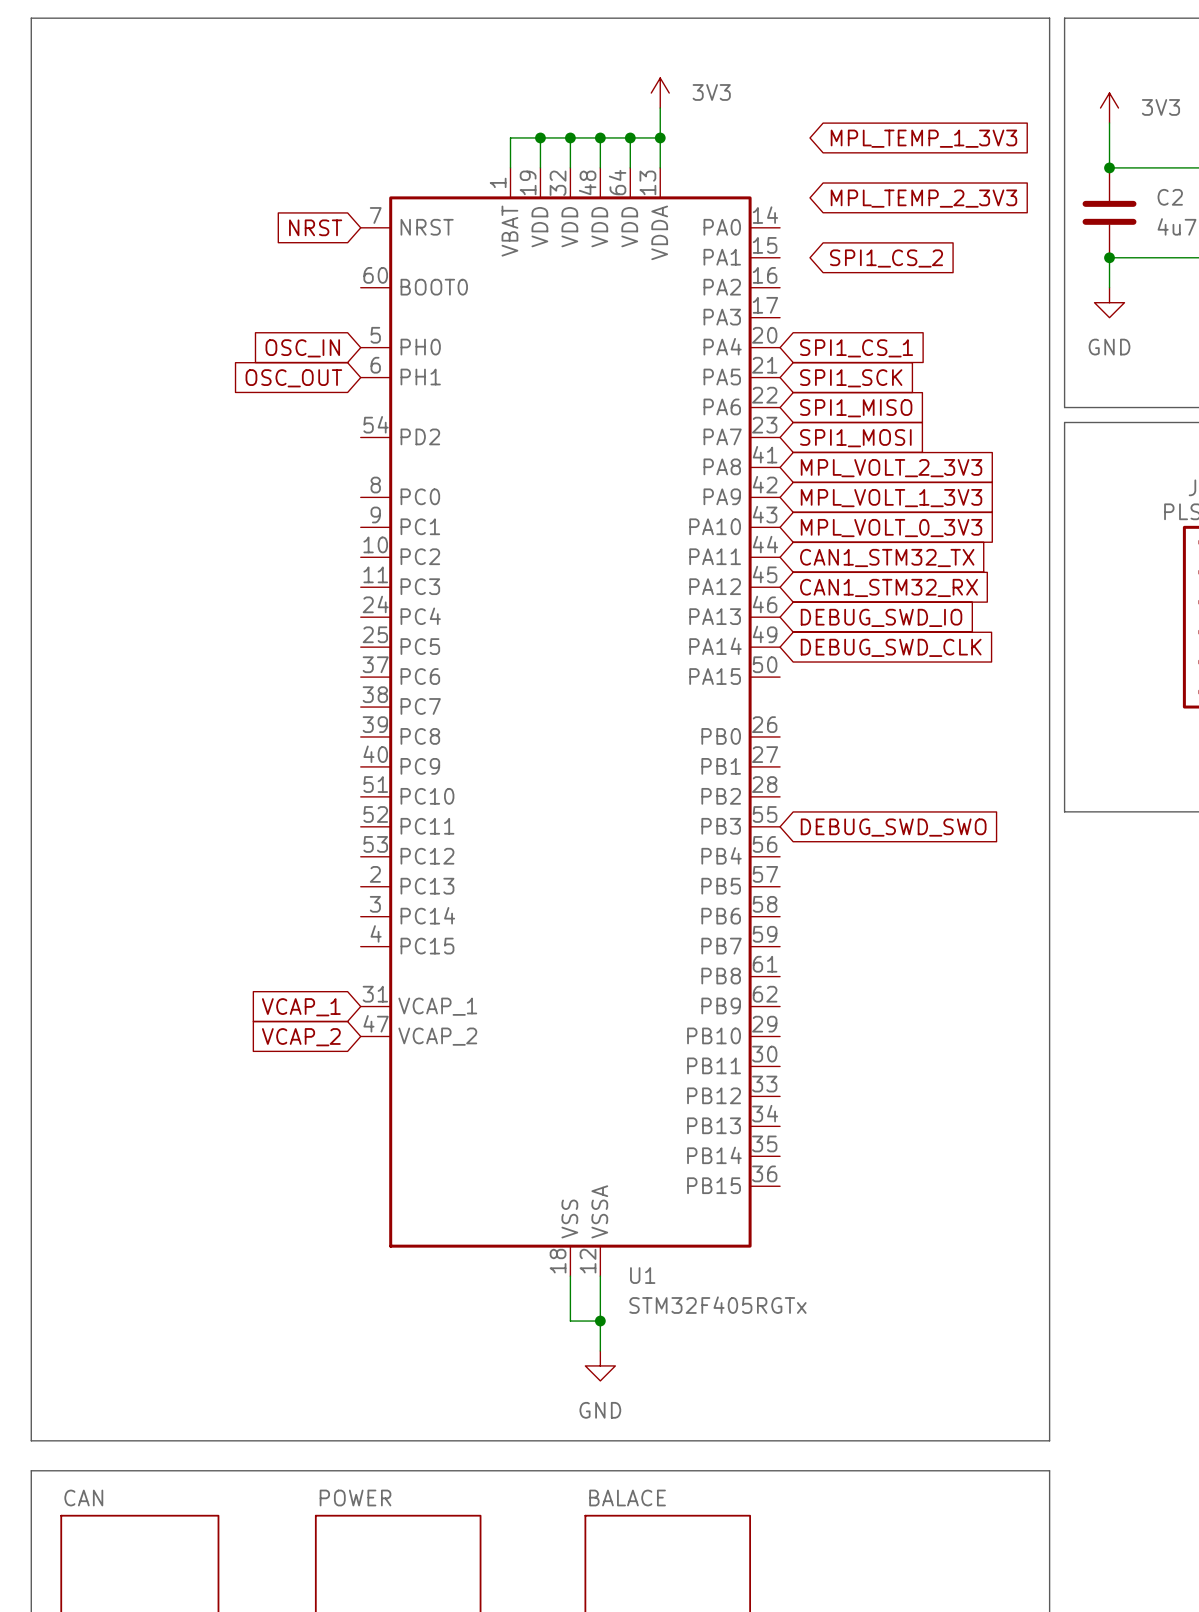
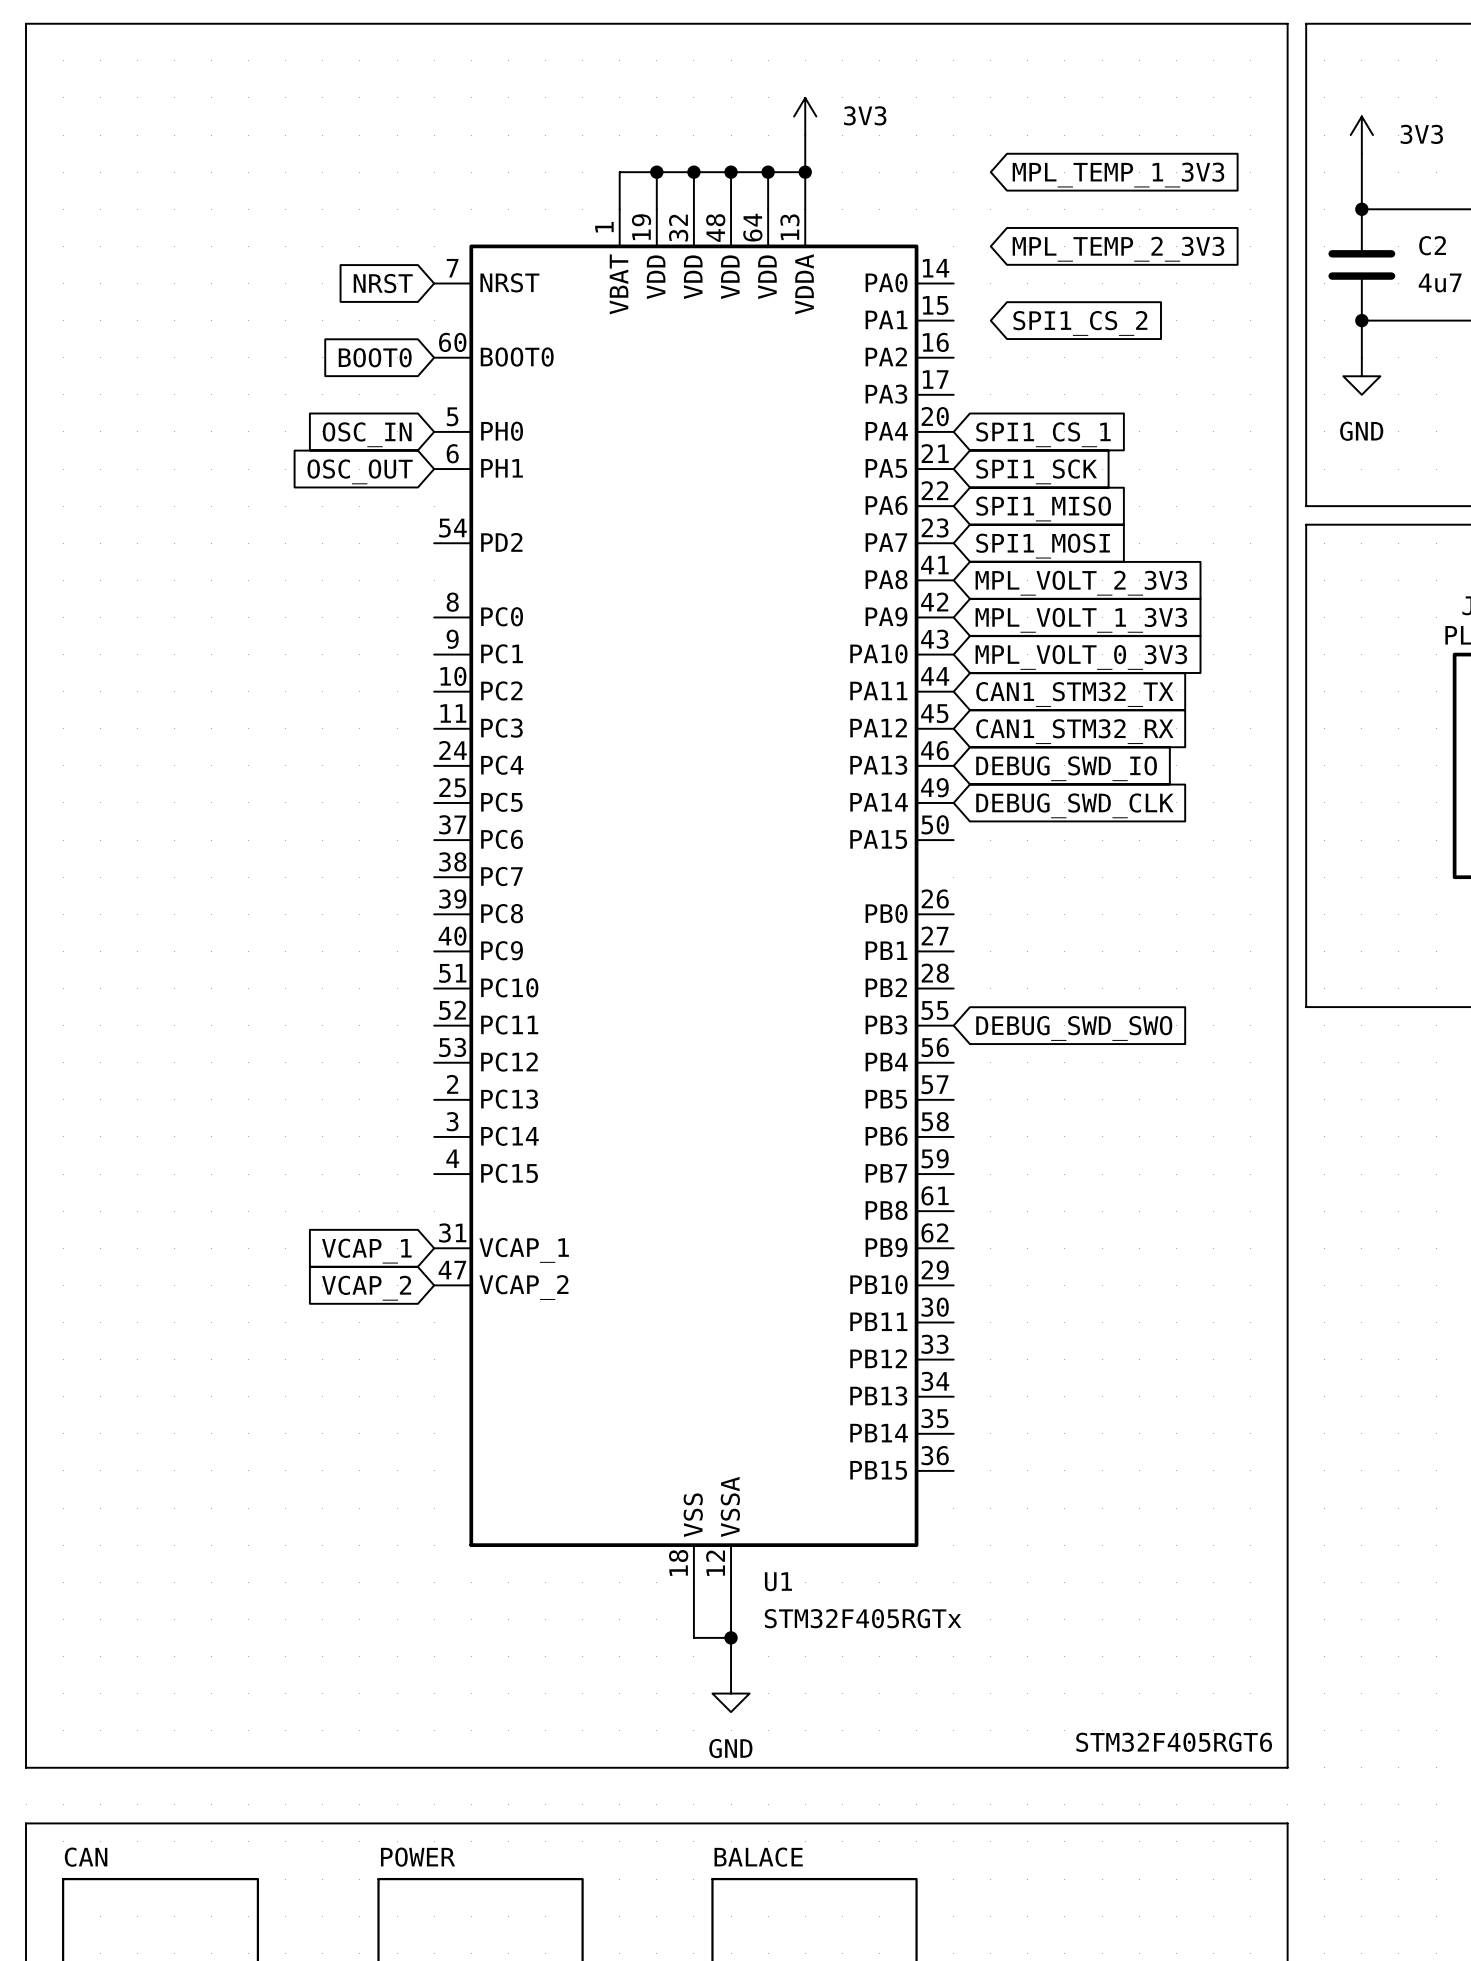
global label: none -> BOOT0 (375, 357)
text: none -> STM32F405RGT6 (1174, 1742)
line: (31, 1425) (31, 1440) (1049, 1440) (1049, 1425) -> (26, 1767) (1287, 1767)

